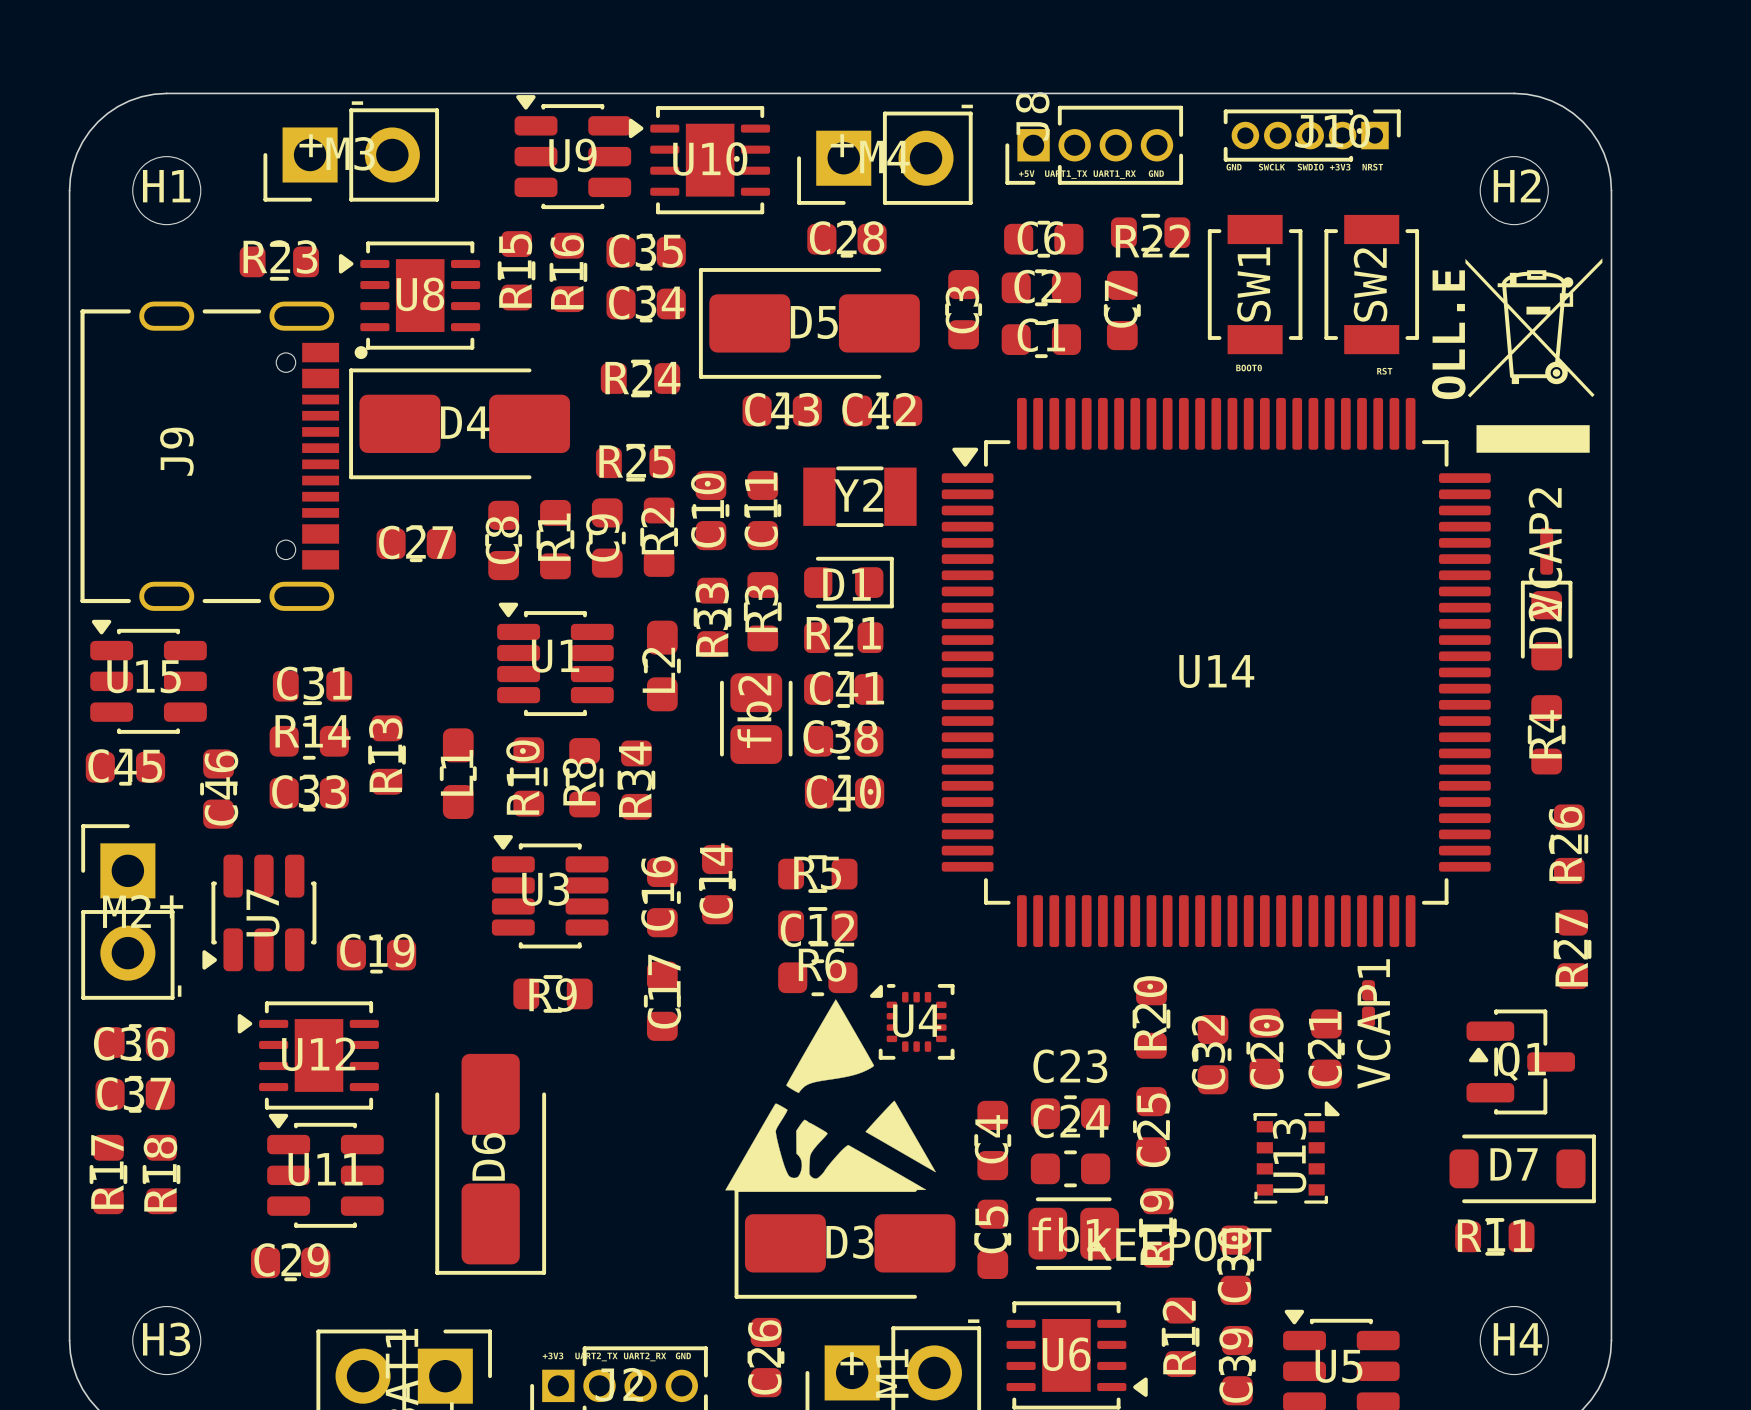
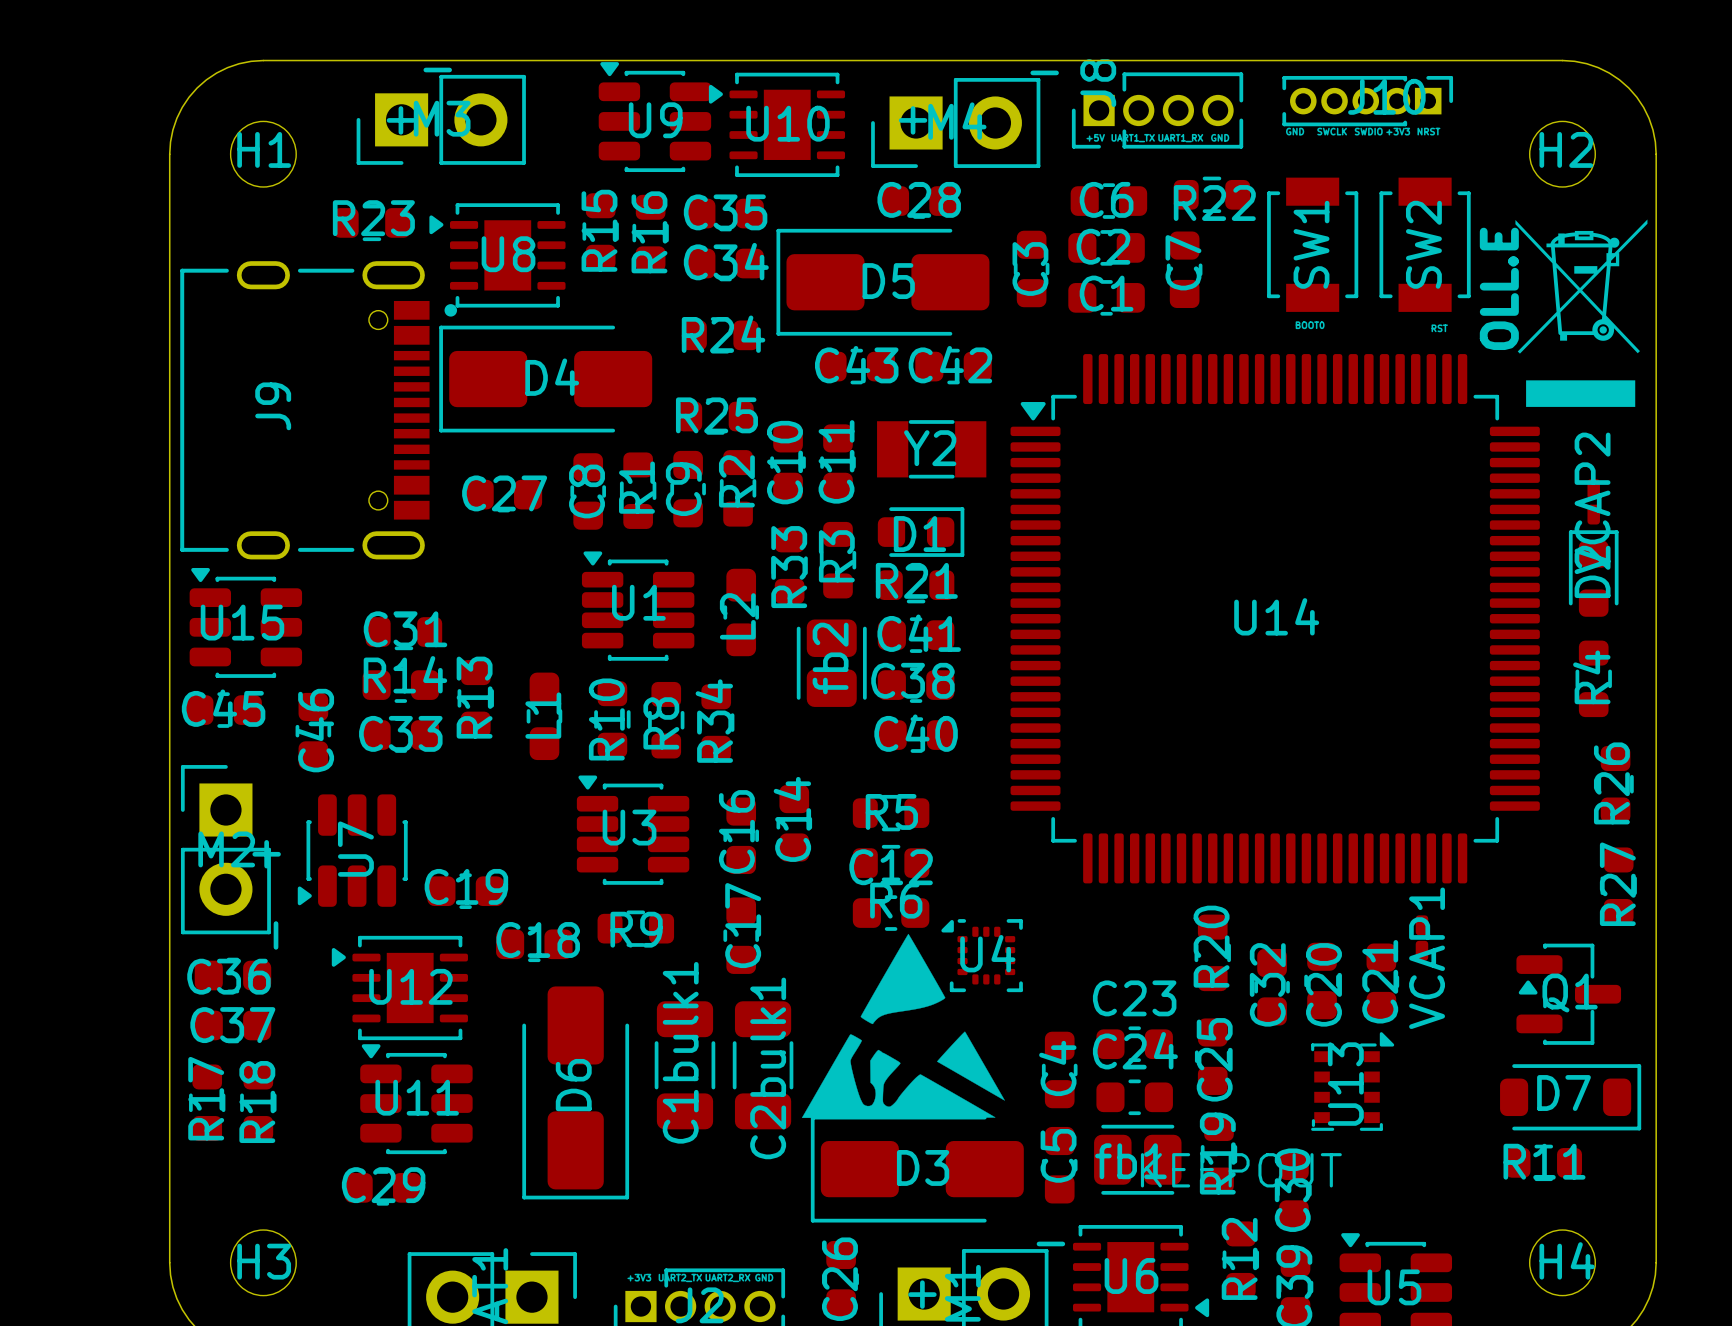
C18: none -> (534, 944)
C1bulk1: none -> (684, 1065)
C2bulk1: none -> (763, 1065)

